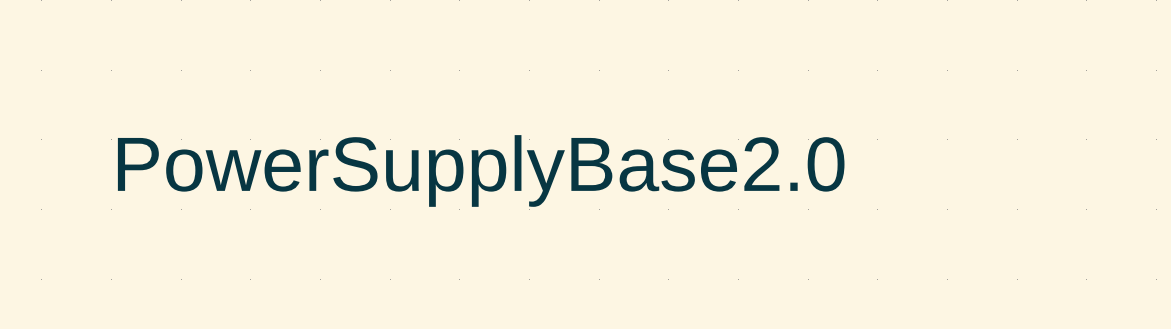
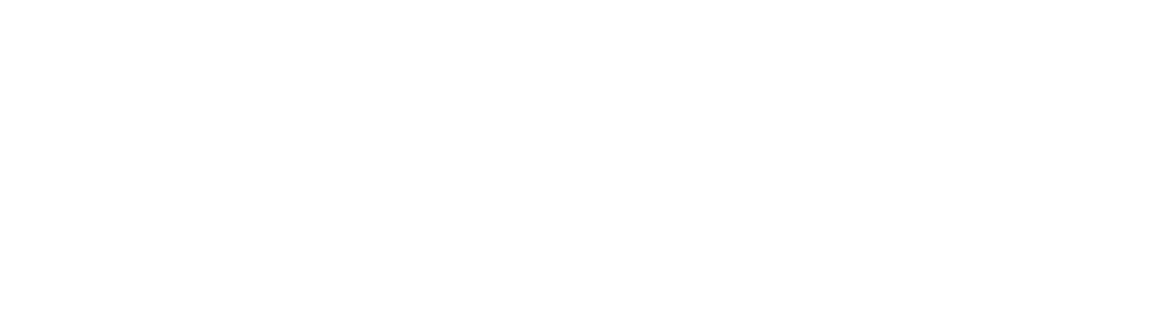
label: PowerSupplyBase2.0 (481, 170) -> none

